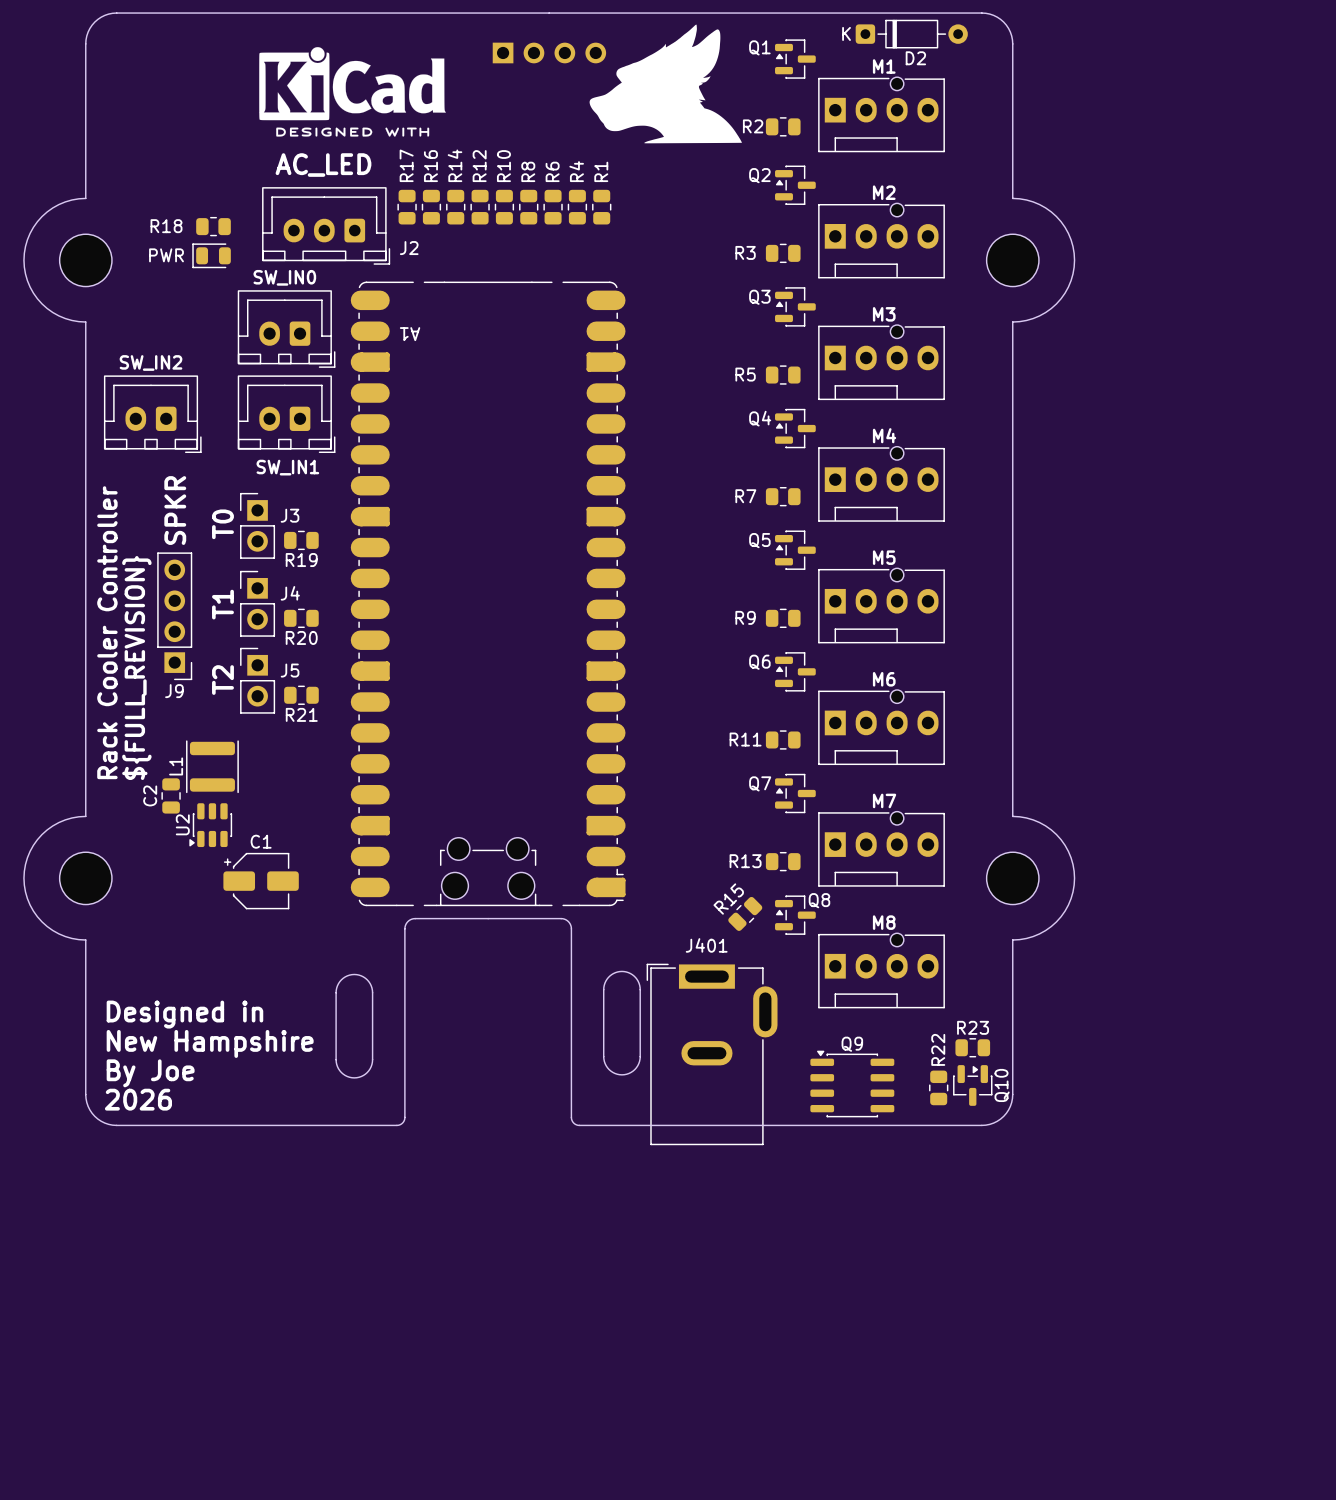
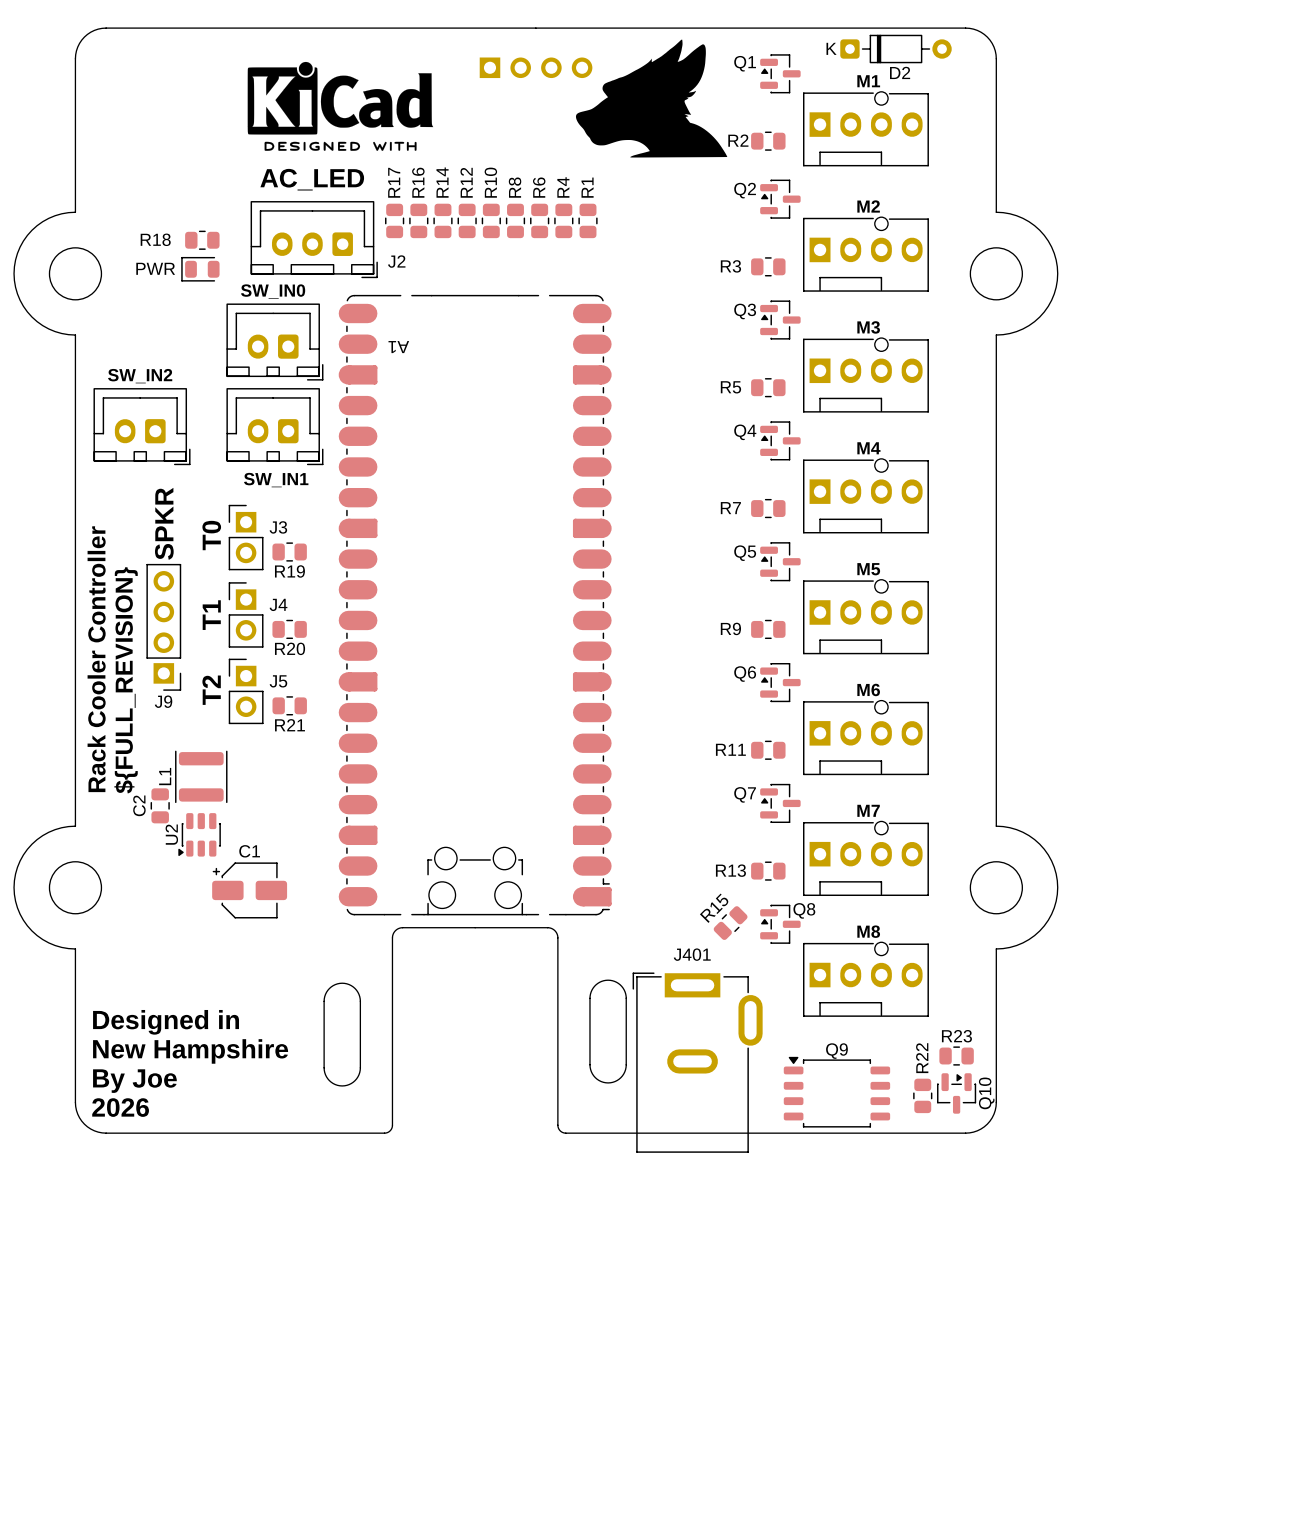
Q9 footprint: [810, 1050, 895, 1118] -> [783, 1056, 891, 1128]

